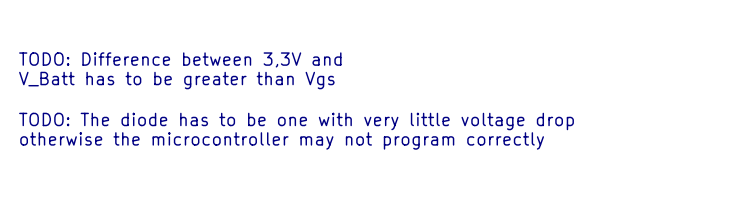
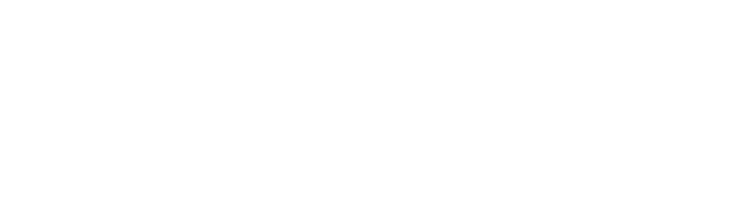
text: TODO: Difference between 3,3V and (180, 59) -> none
text: V_Batt has to be greater than Vgs (176, 80) -> none
text: TODO: The diode has to be one with very little voltage drop (296, 121) -> none
text: otherwise the microcontroller may not program correctly (282, 140) -> none

